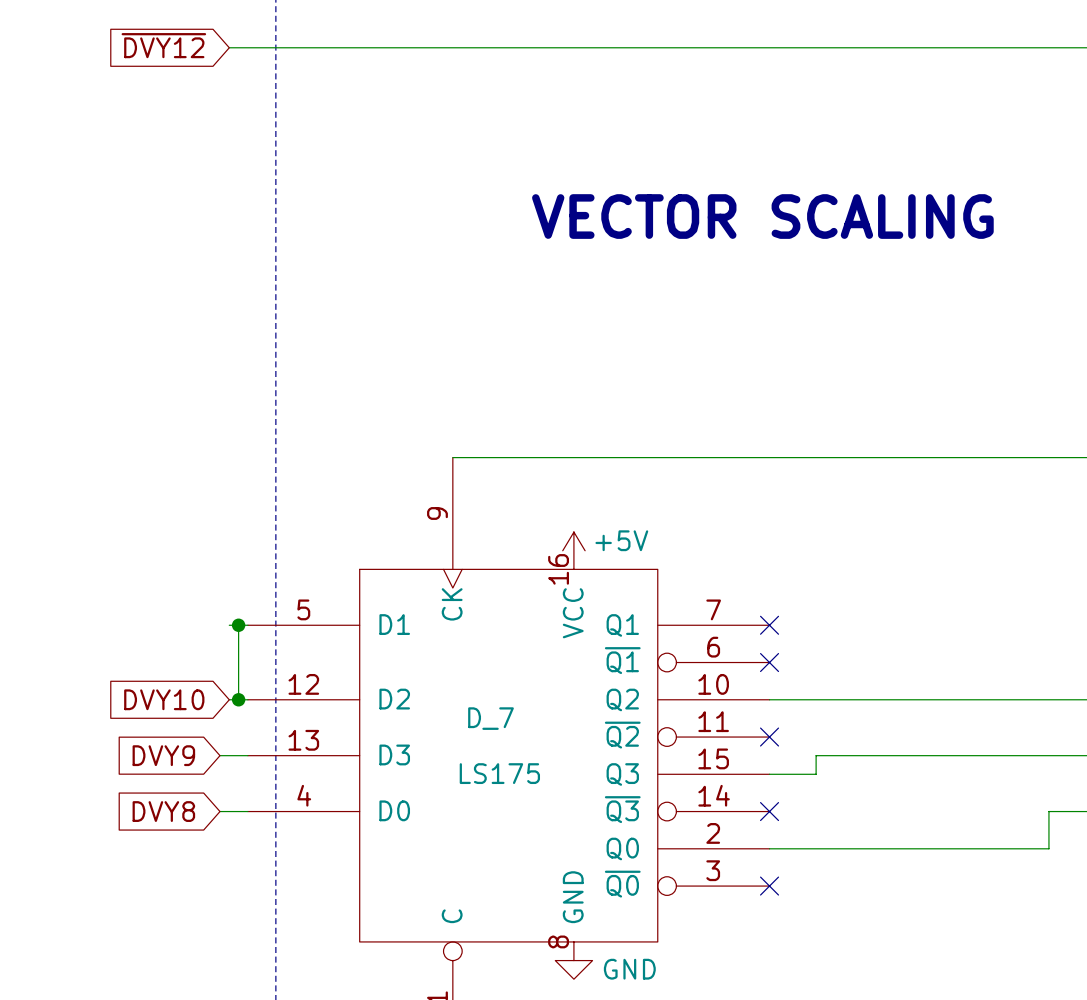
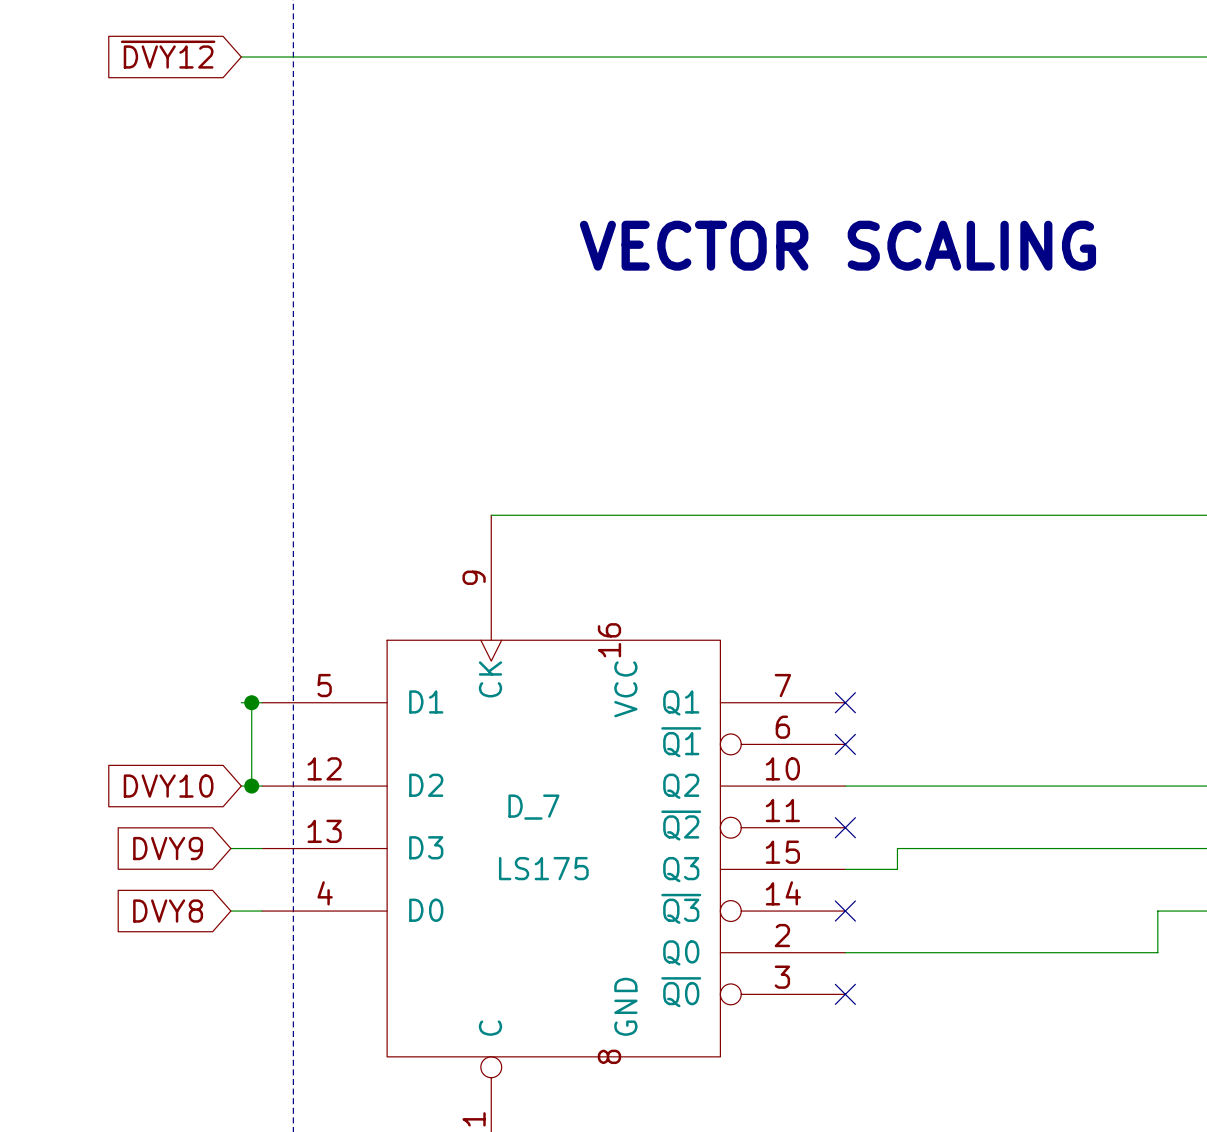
power symbol: +5V (573, 550) -> none
power symbol: GND (573, 960) -> none

